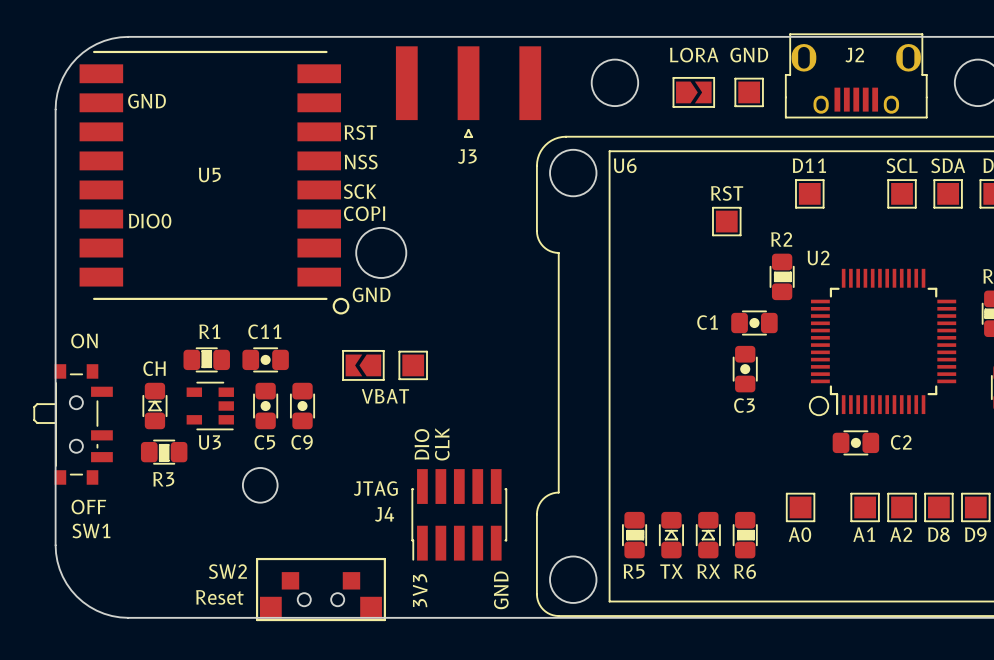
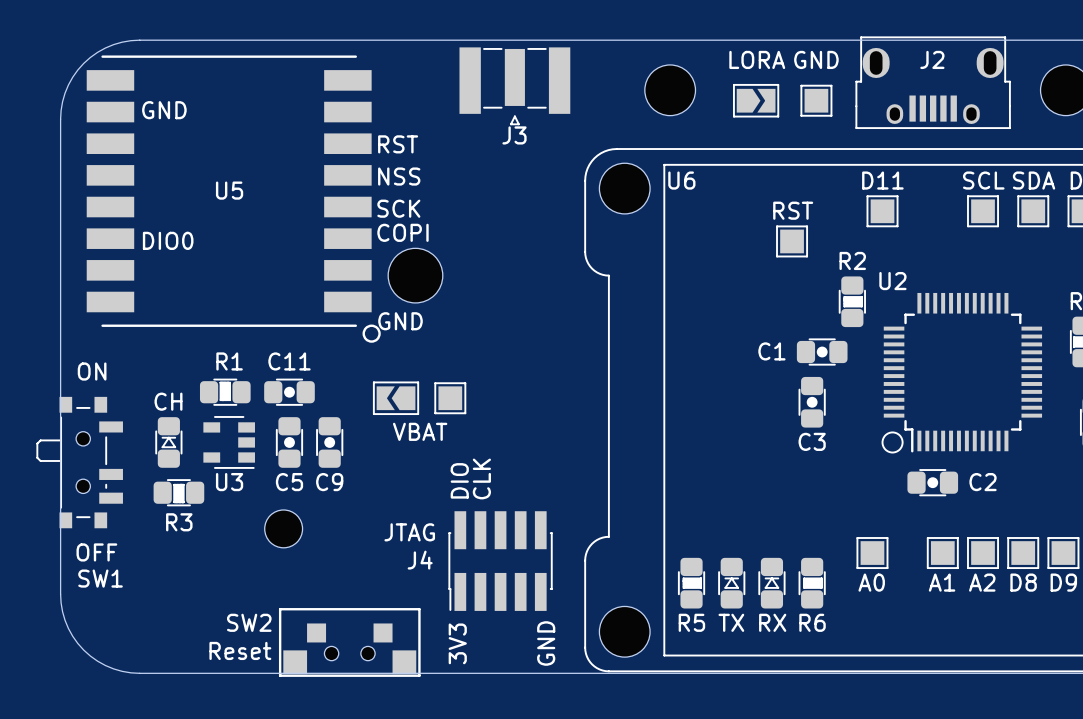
J3 footprint: [395, 46, 542, 138] -> [459, 47, 571, 126]

